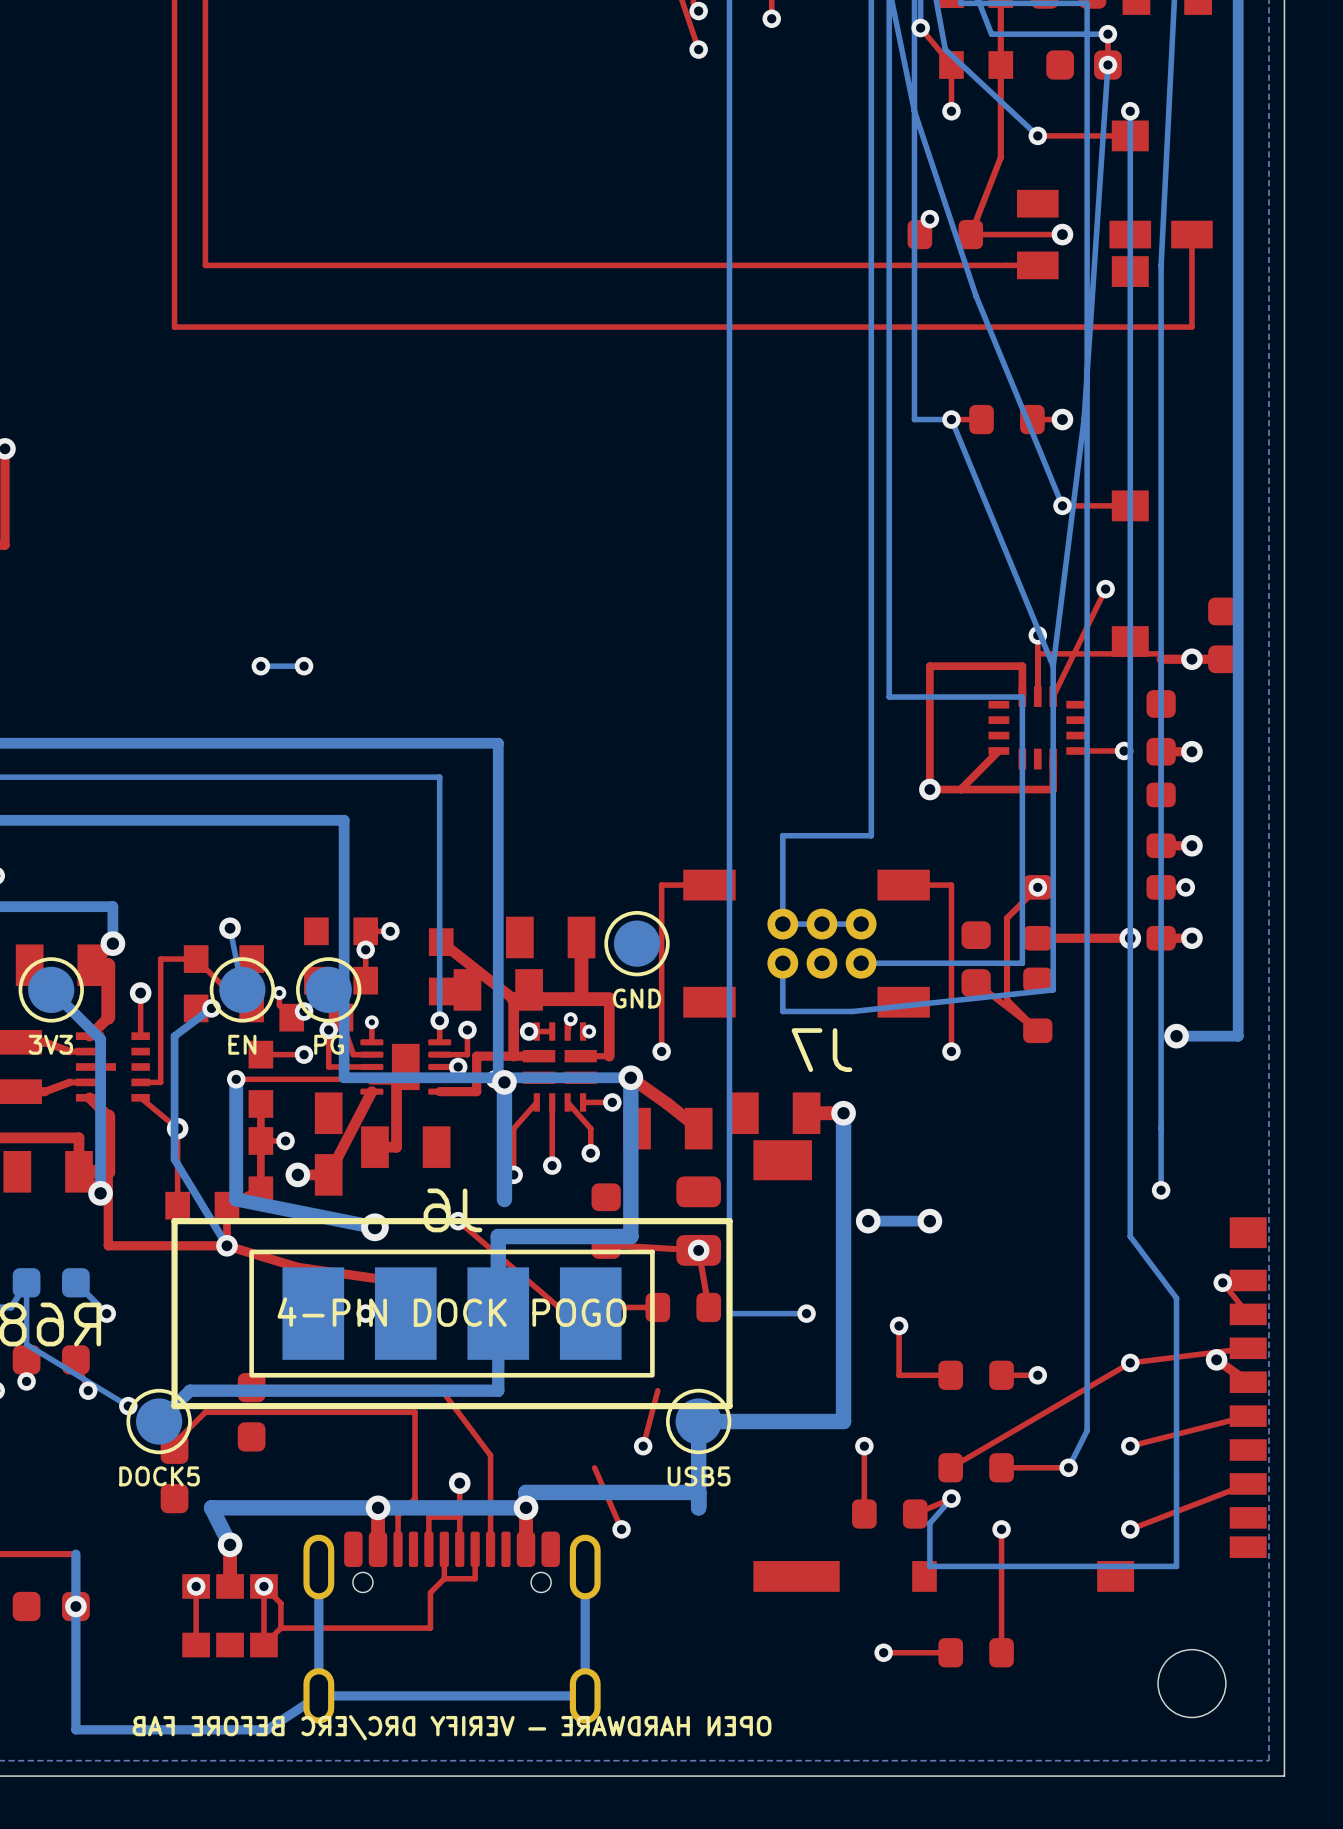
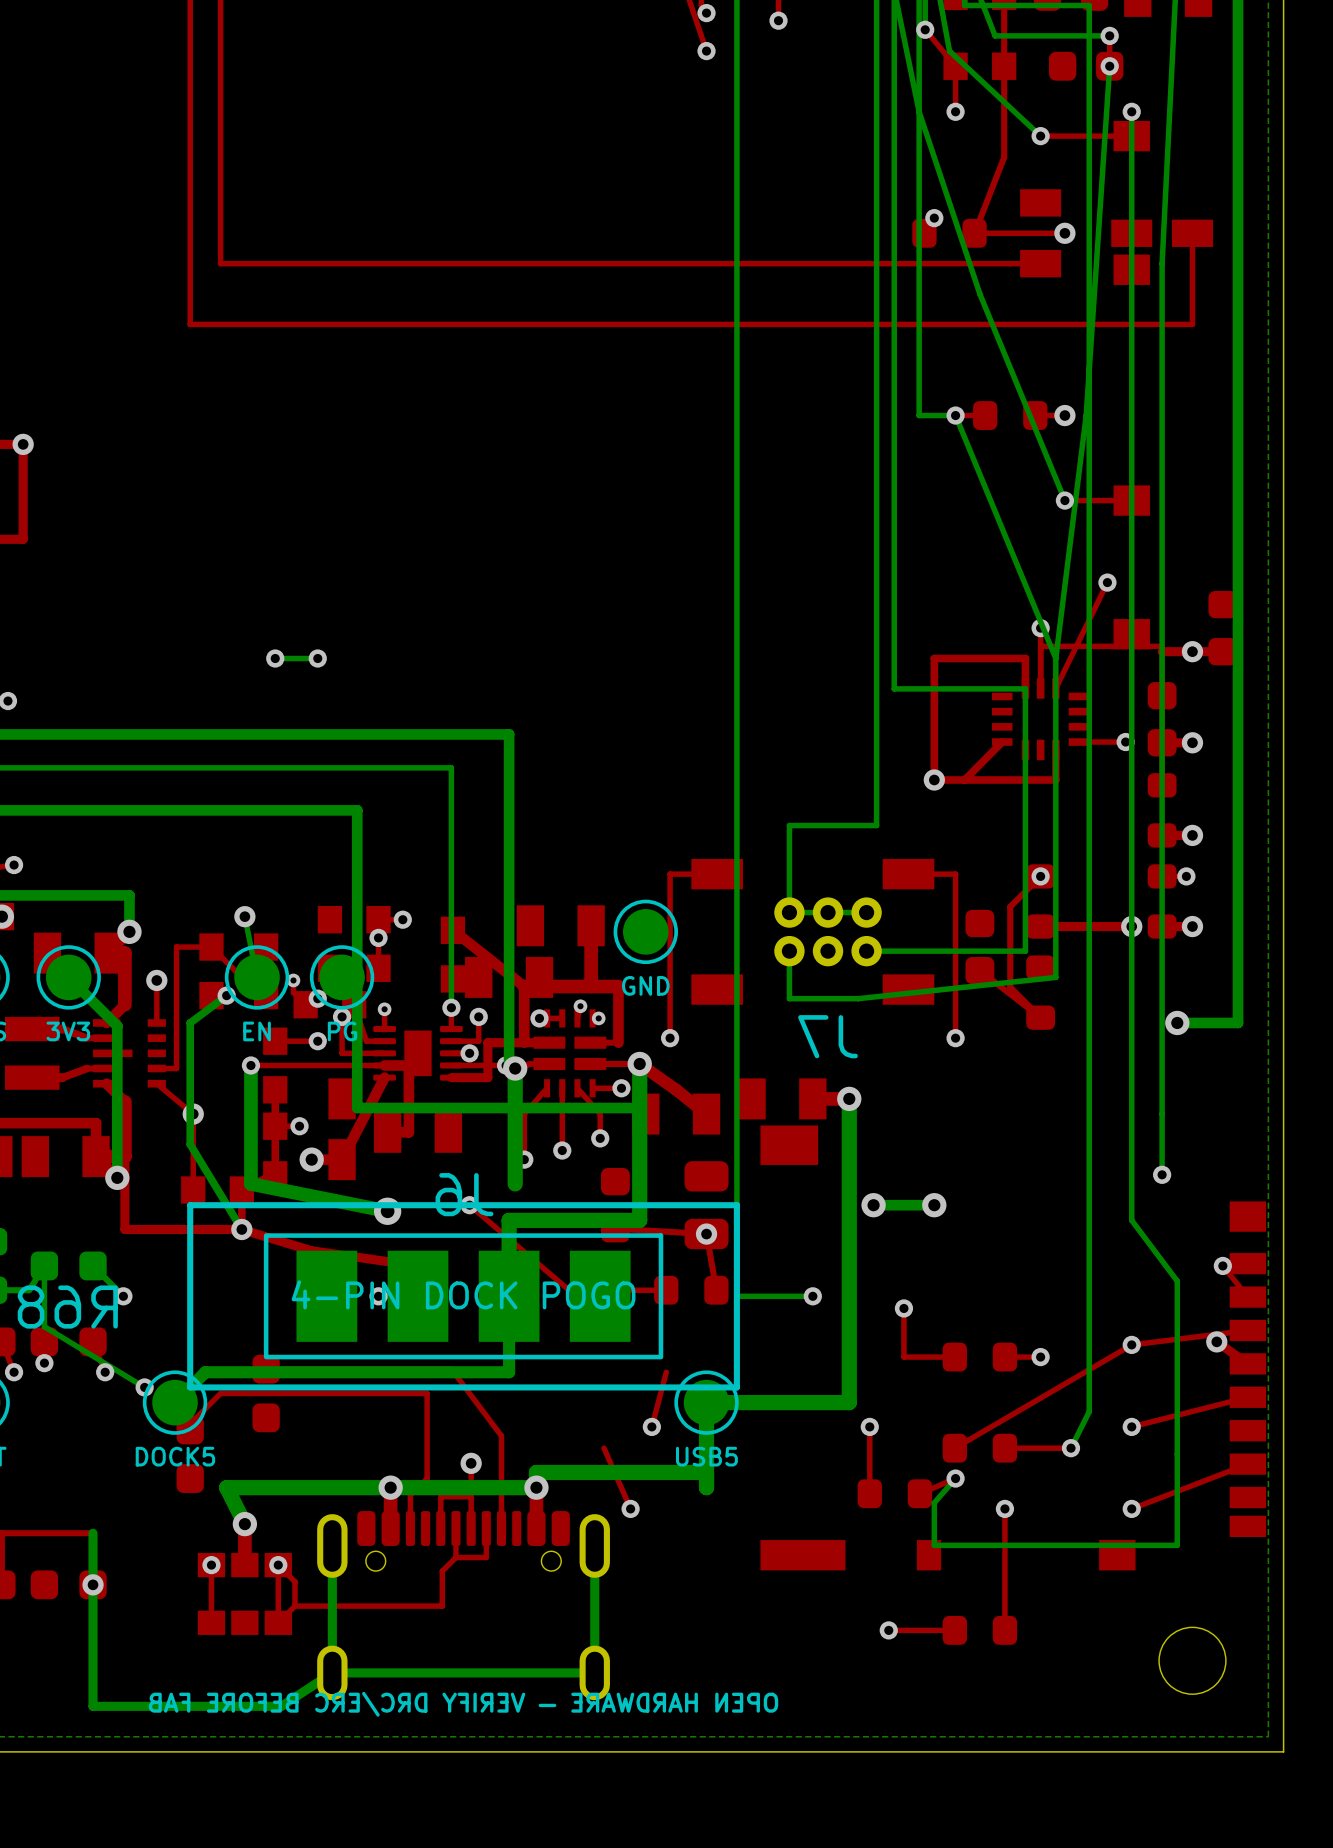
bottom track: (630, 1077) (344, 1077) -> (639, 1063) (639, 1108) (357, 1108) (357, 1063)

